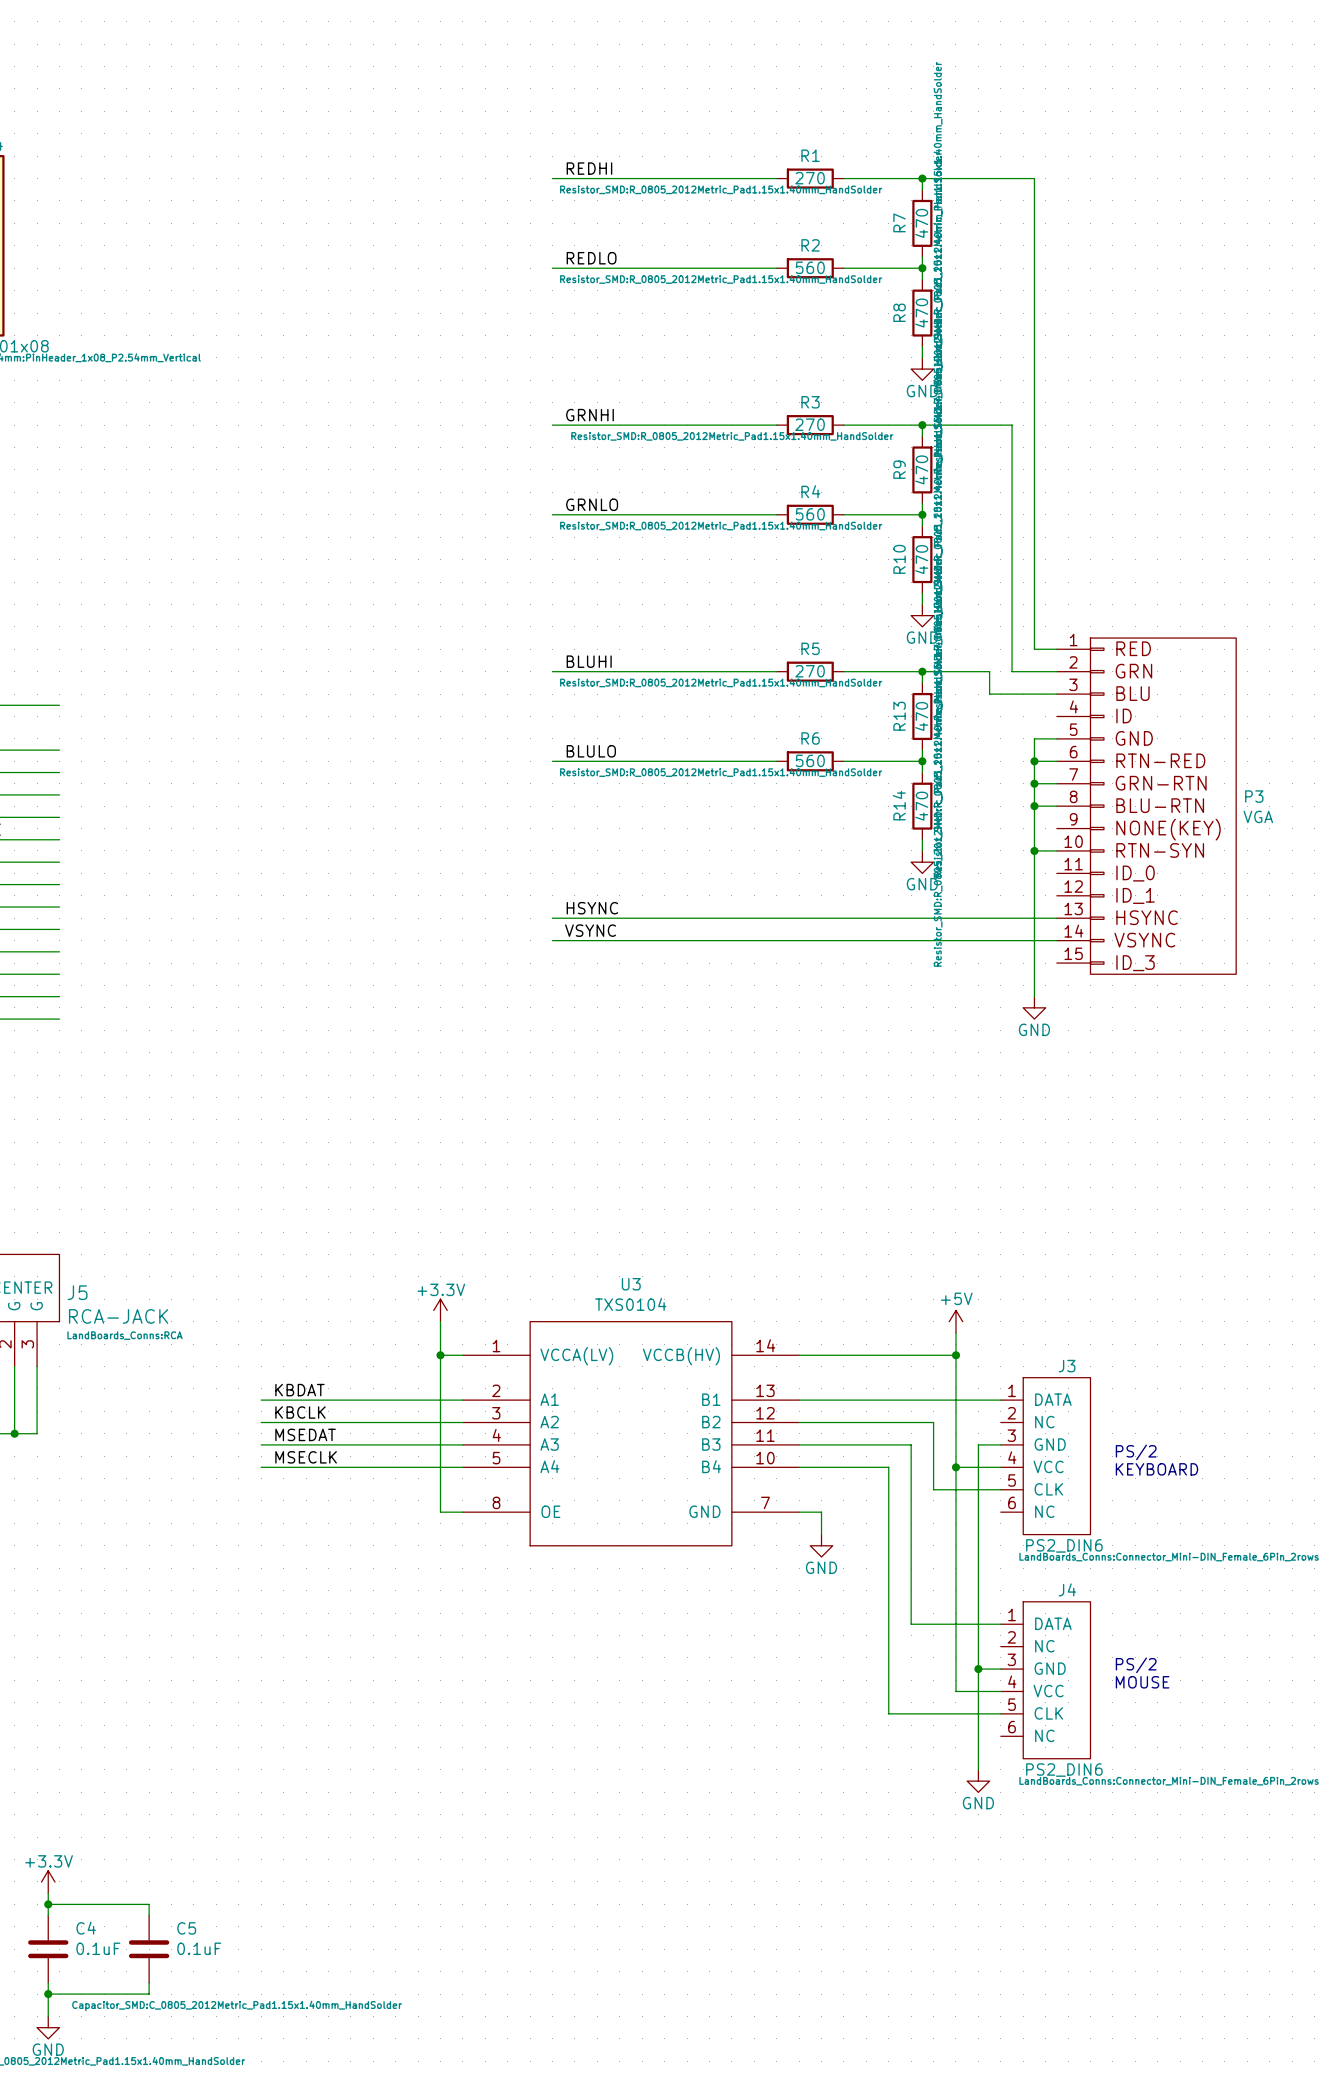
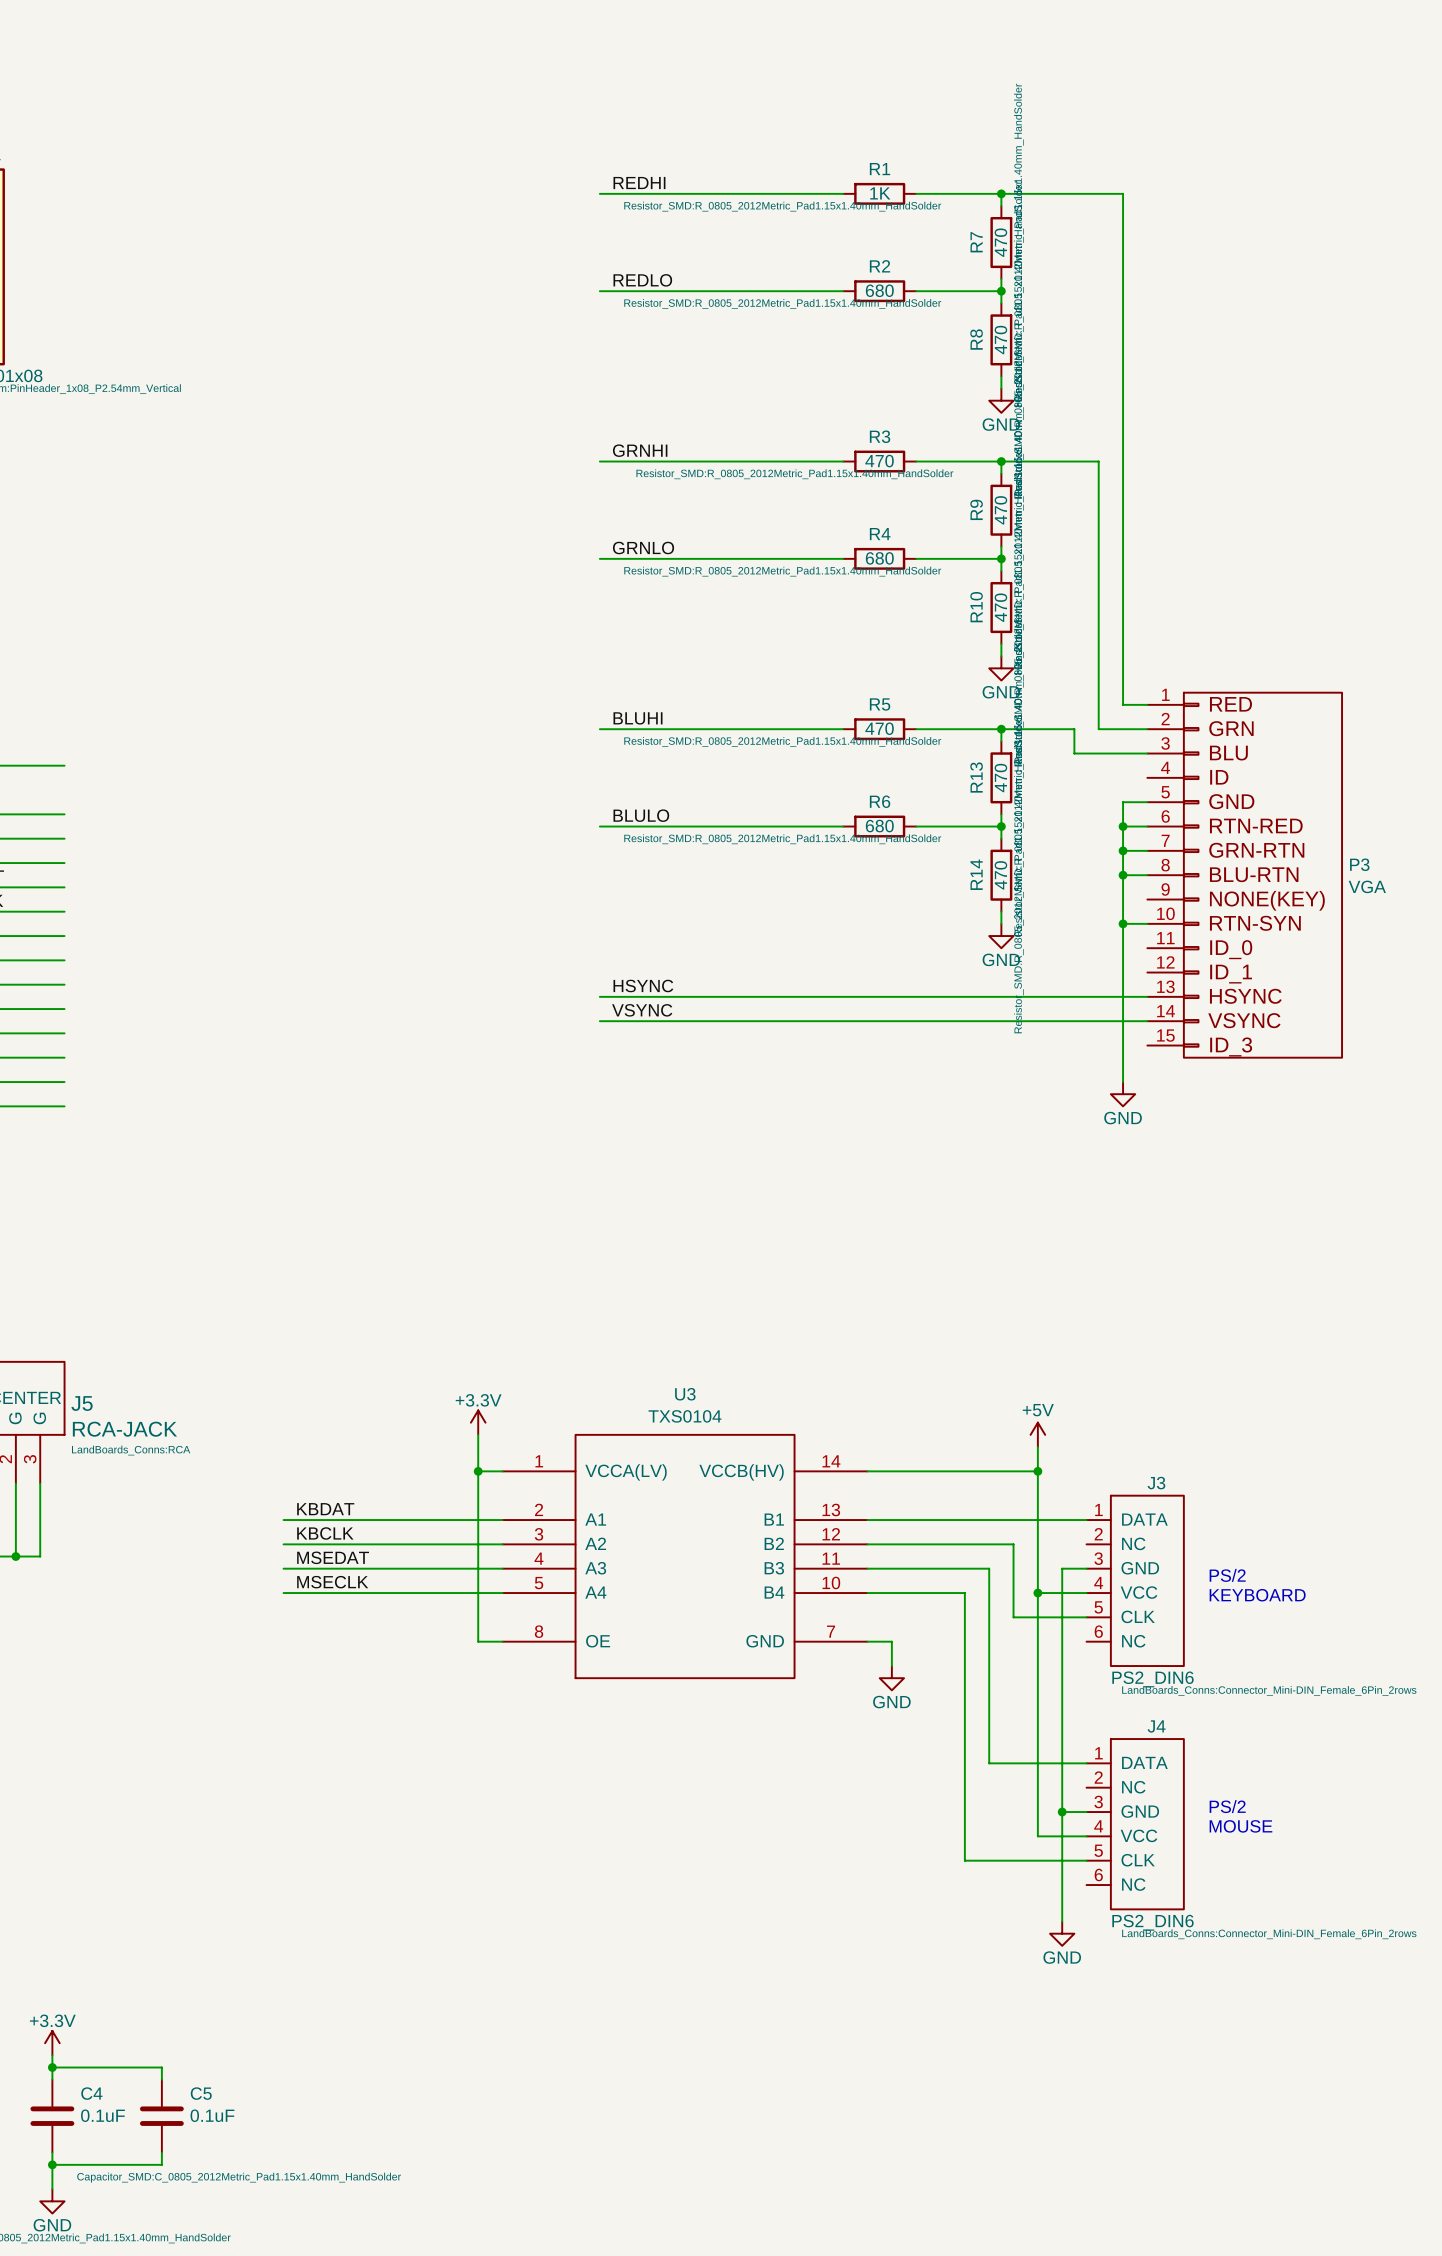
R1 value: 270 (810, 178) -> 1K (880, 193)
R2 value: 560 (810, 267) -> 680 (879, 290)
R3 value: 270 (810, 424) -> 470 (879, 461)
R4 value: 560 (810, 514) -> 680 (879, 558)
R5 value: 270 (810, 671) -> 470 (879, 728)
R6 value: 560 (810, 760) -> 680 (879, 826)

